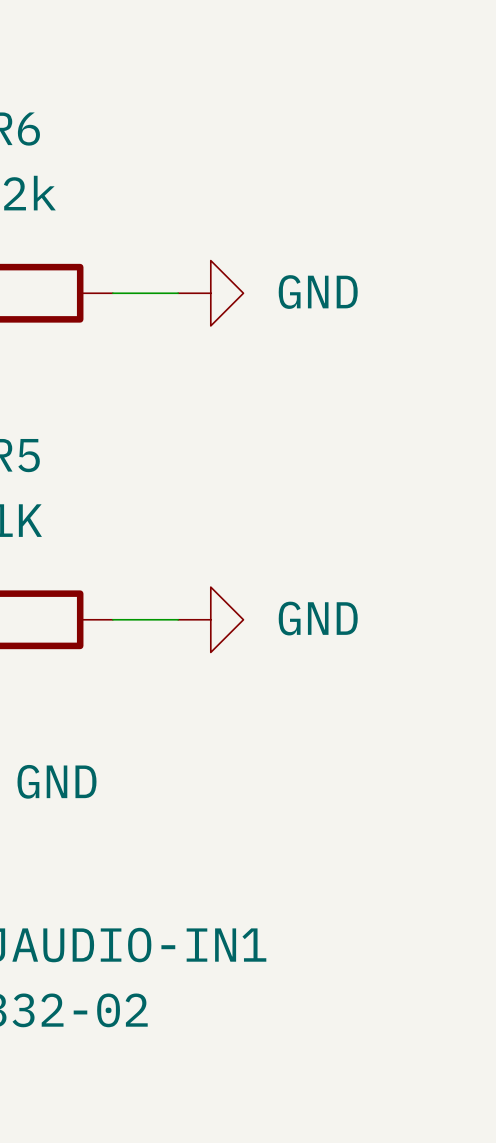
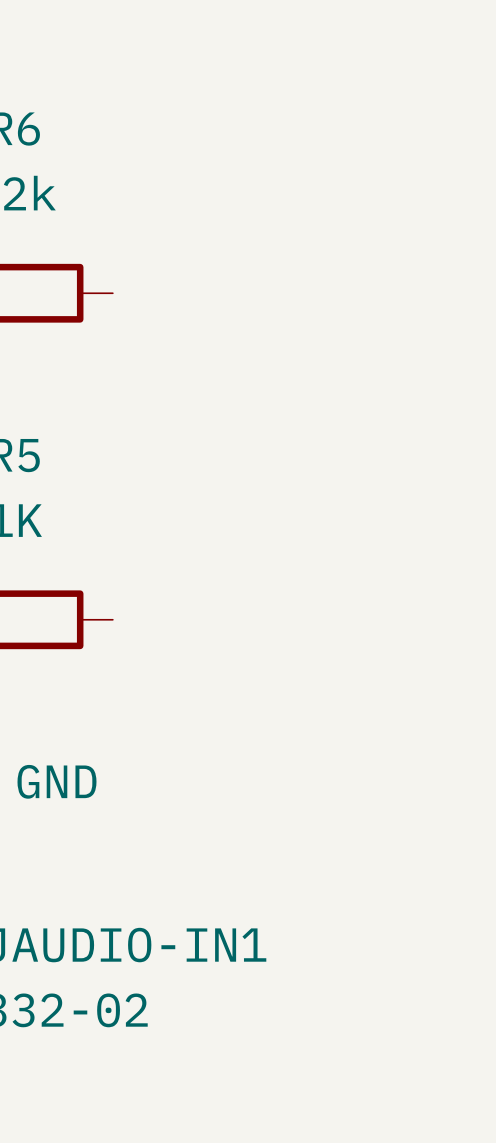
wire: (112, 293) (178, 293) -> none
power symbol: GND (210, 293) -> none
wire: (112, 619) (178, 619) -> none
power symbol: GND (210, 619) -> none

